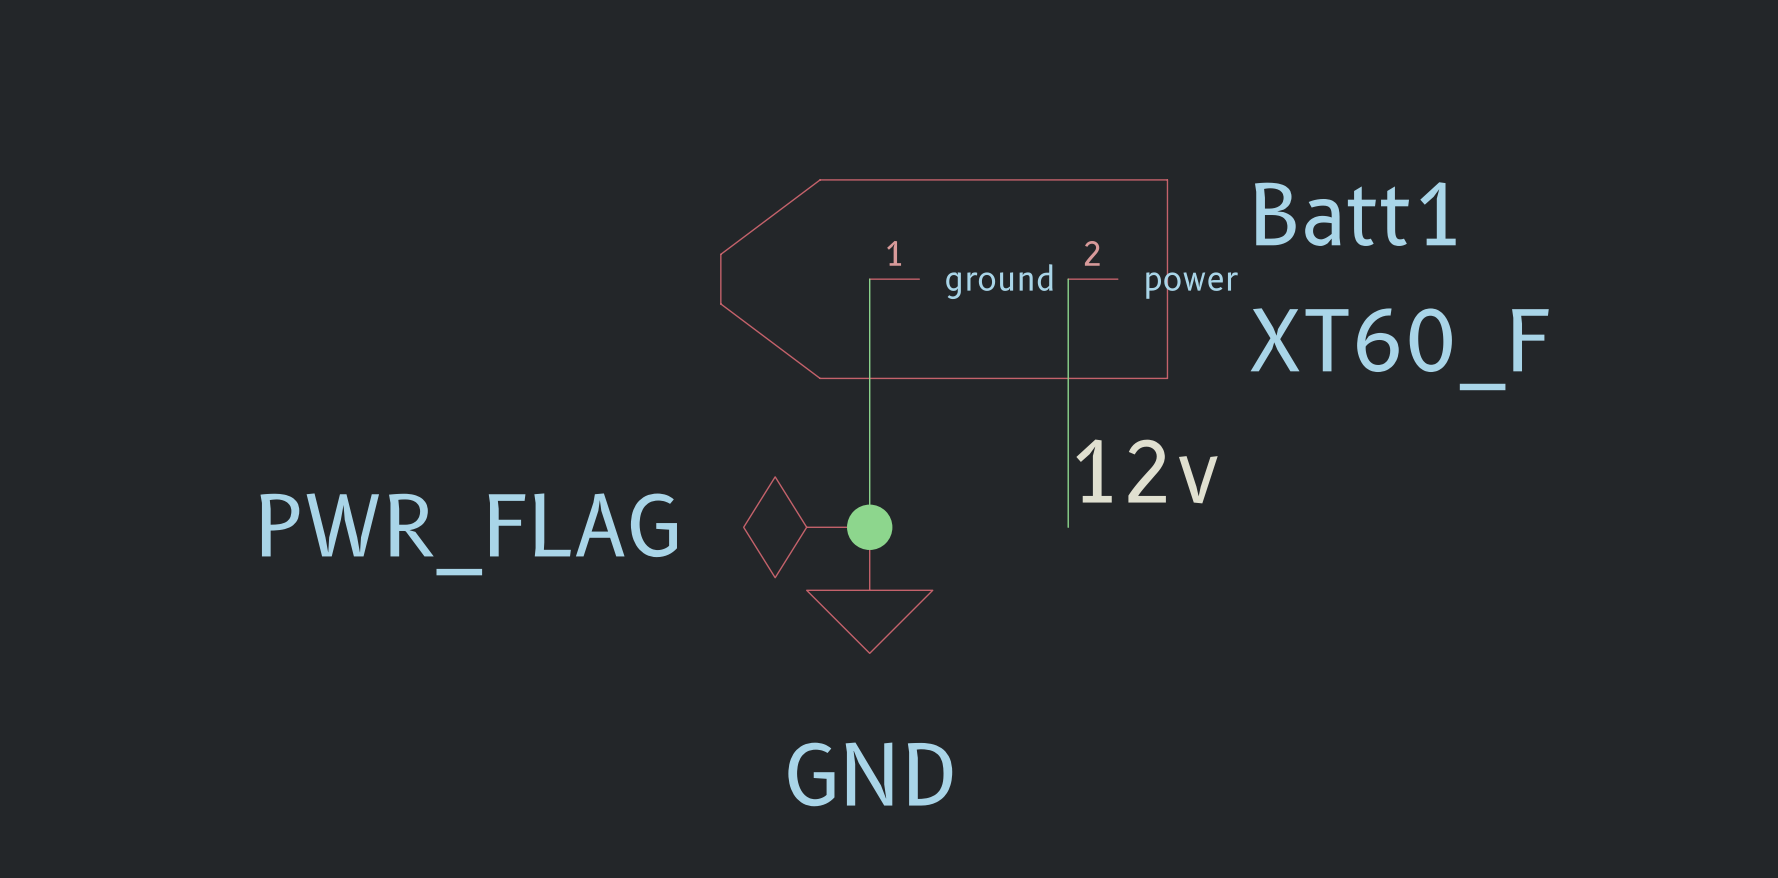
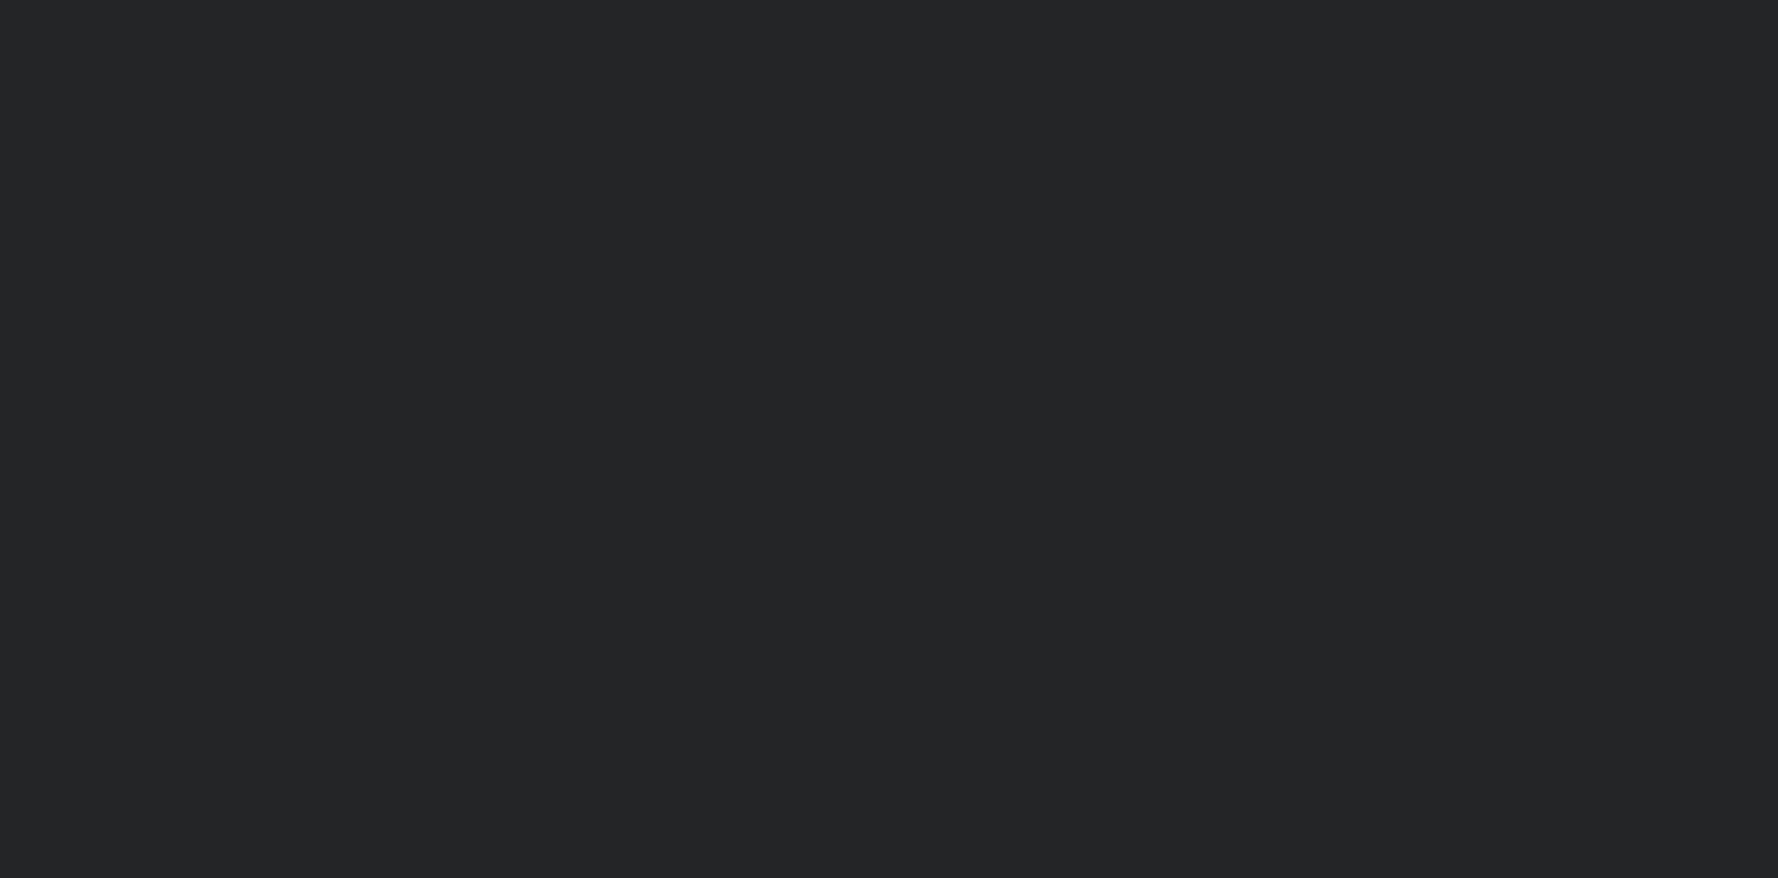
wire: (869, 279) (869, 527) -> none
Batt1: XT60_F (944, 279) -> none
wire: (1068, 279) (1068, 527) -> none
label: 12v (1147, 471) -> none
power symbol: PWR_FLAG (806, 527) -> none
junction: (869, 527) -> none
power symbol: GND (869, 590) -> none

